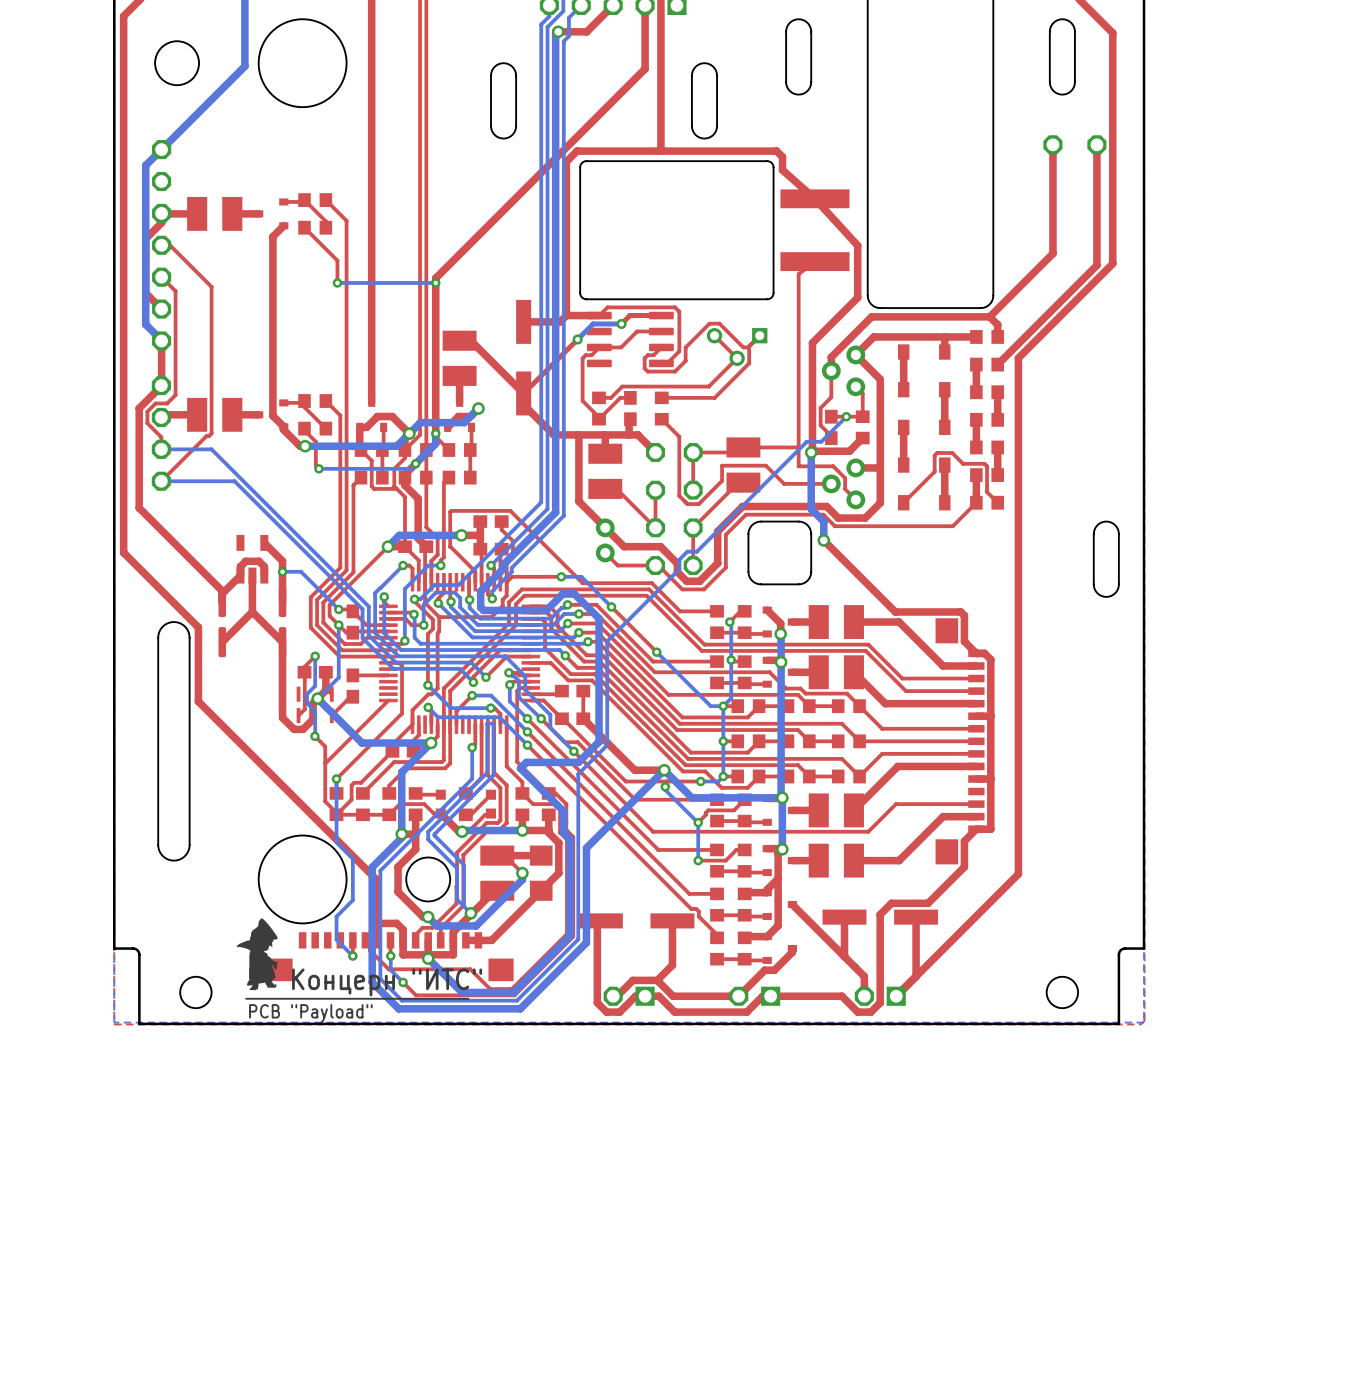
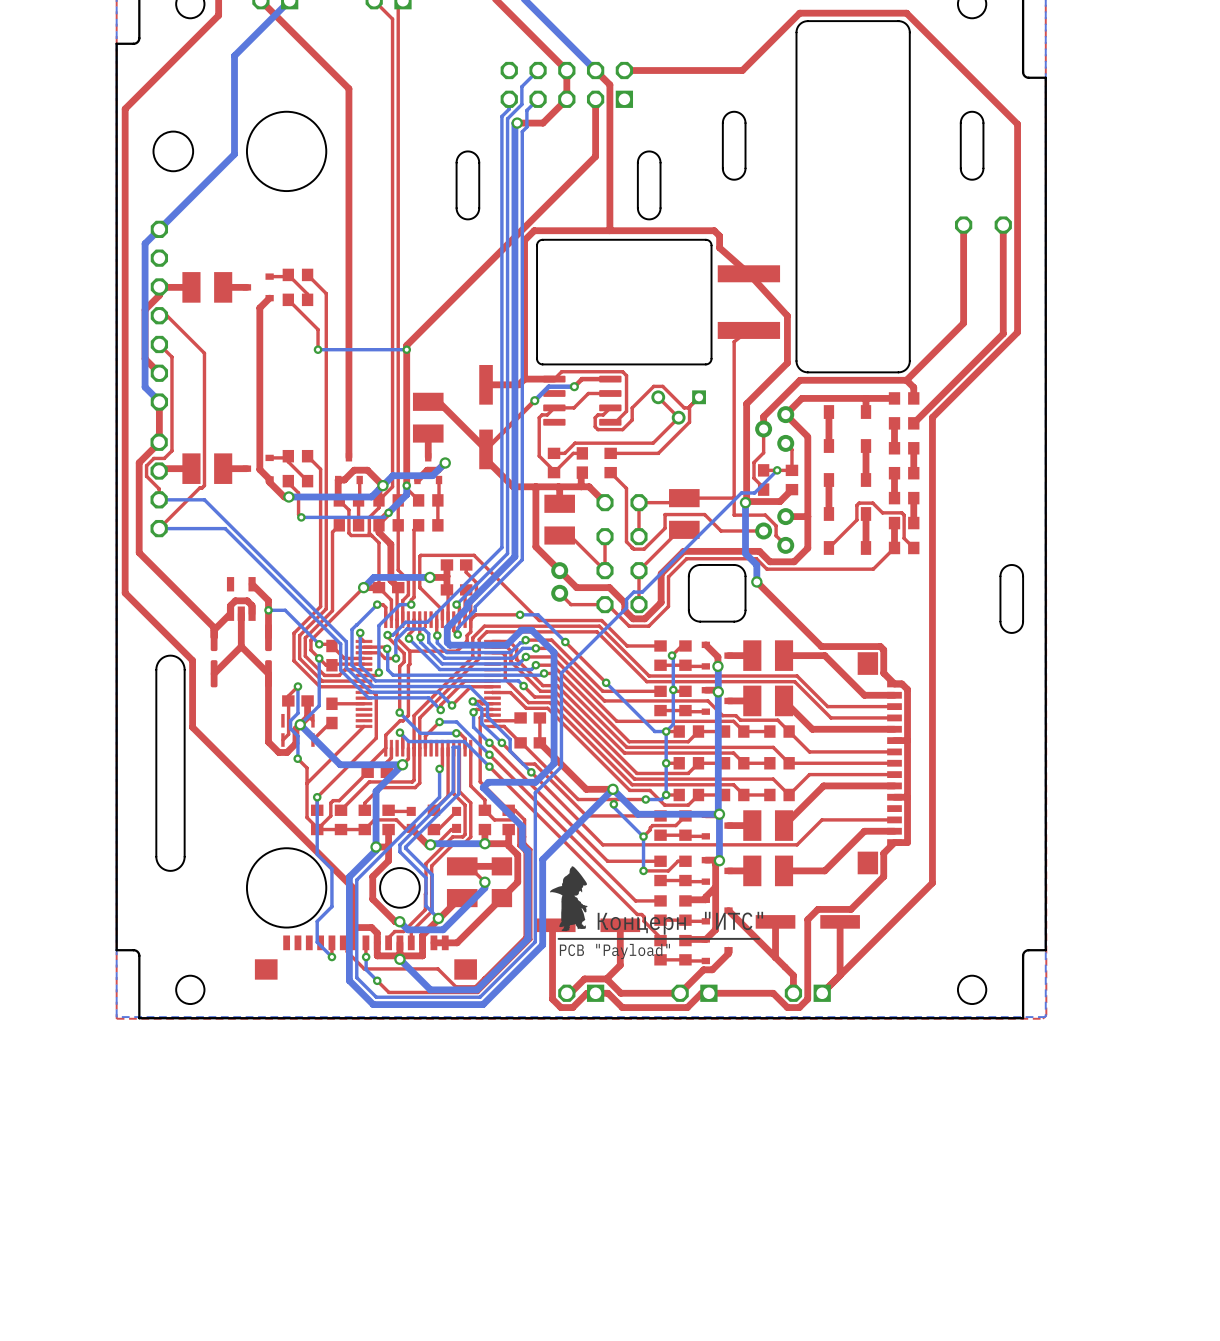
drawing: none -> [550, 866, 760, 940]
drawing: [236, 918, 470, 1000] -> none

